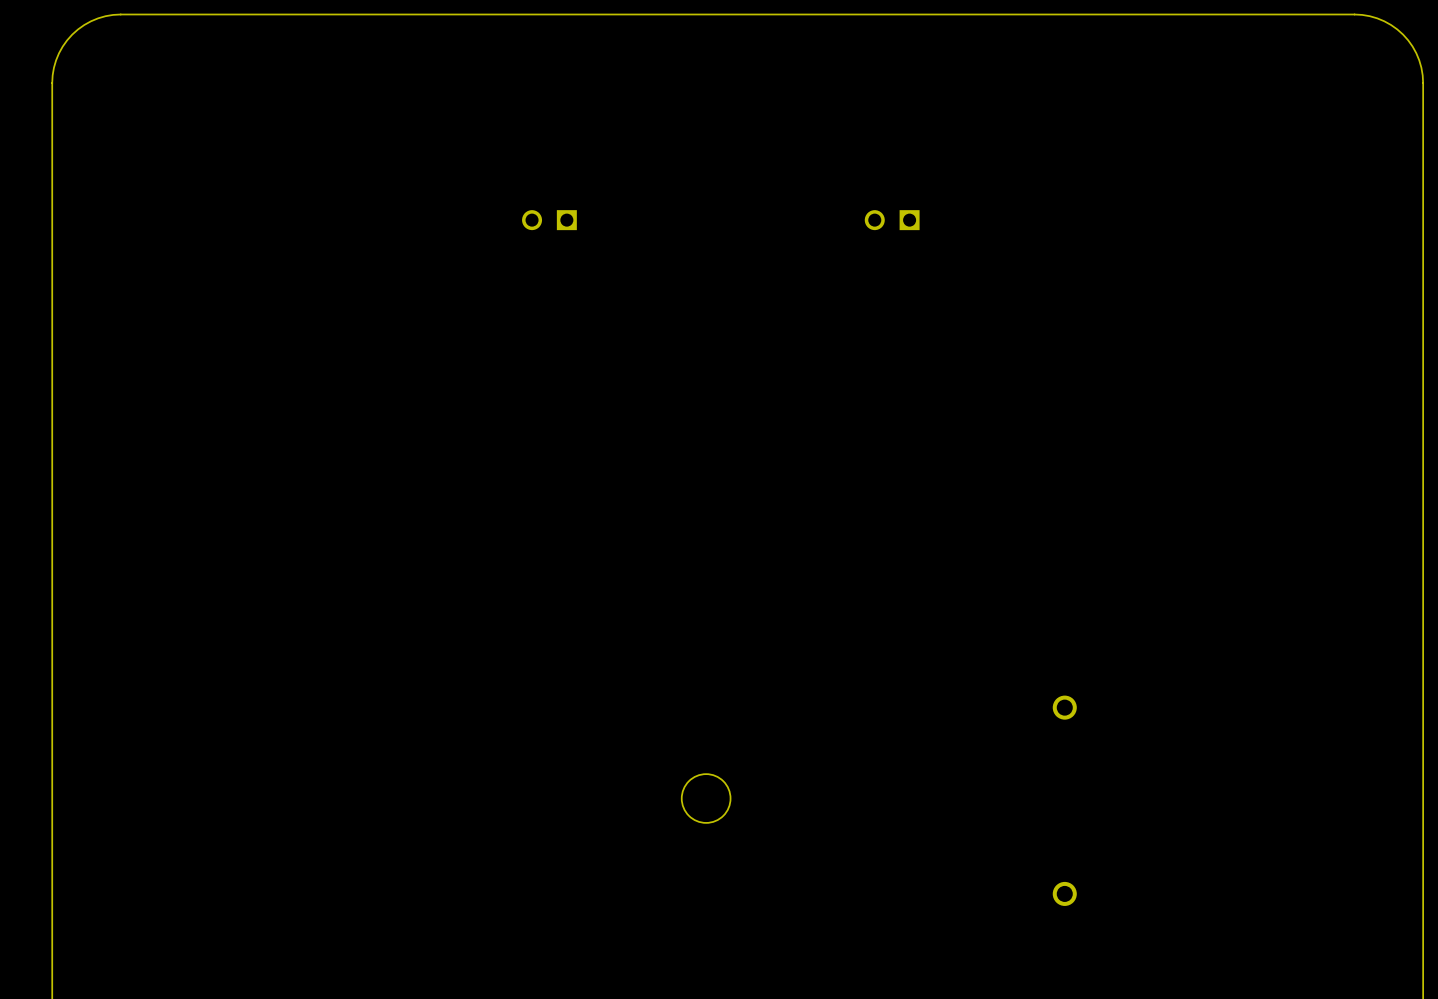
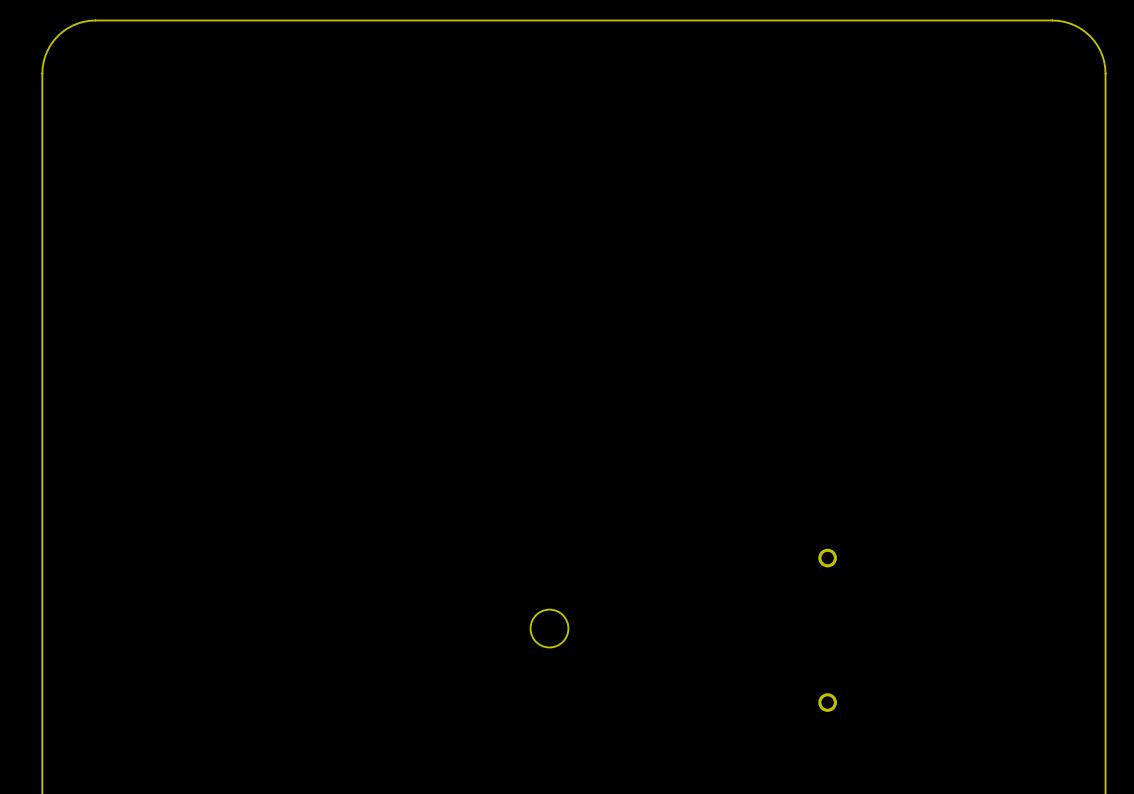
part: (549, 220) -> none
part: (892, 220) -> none

